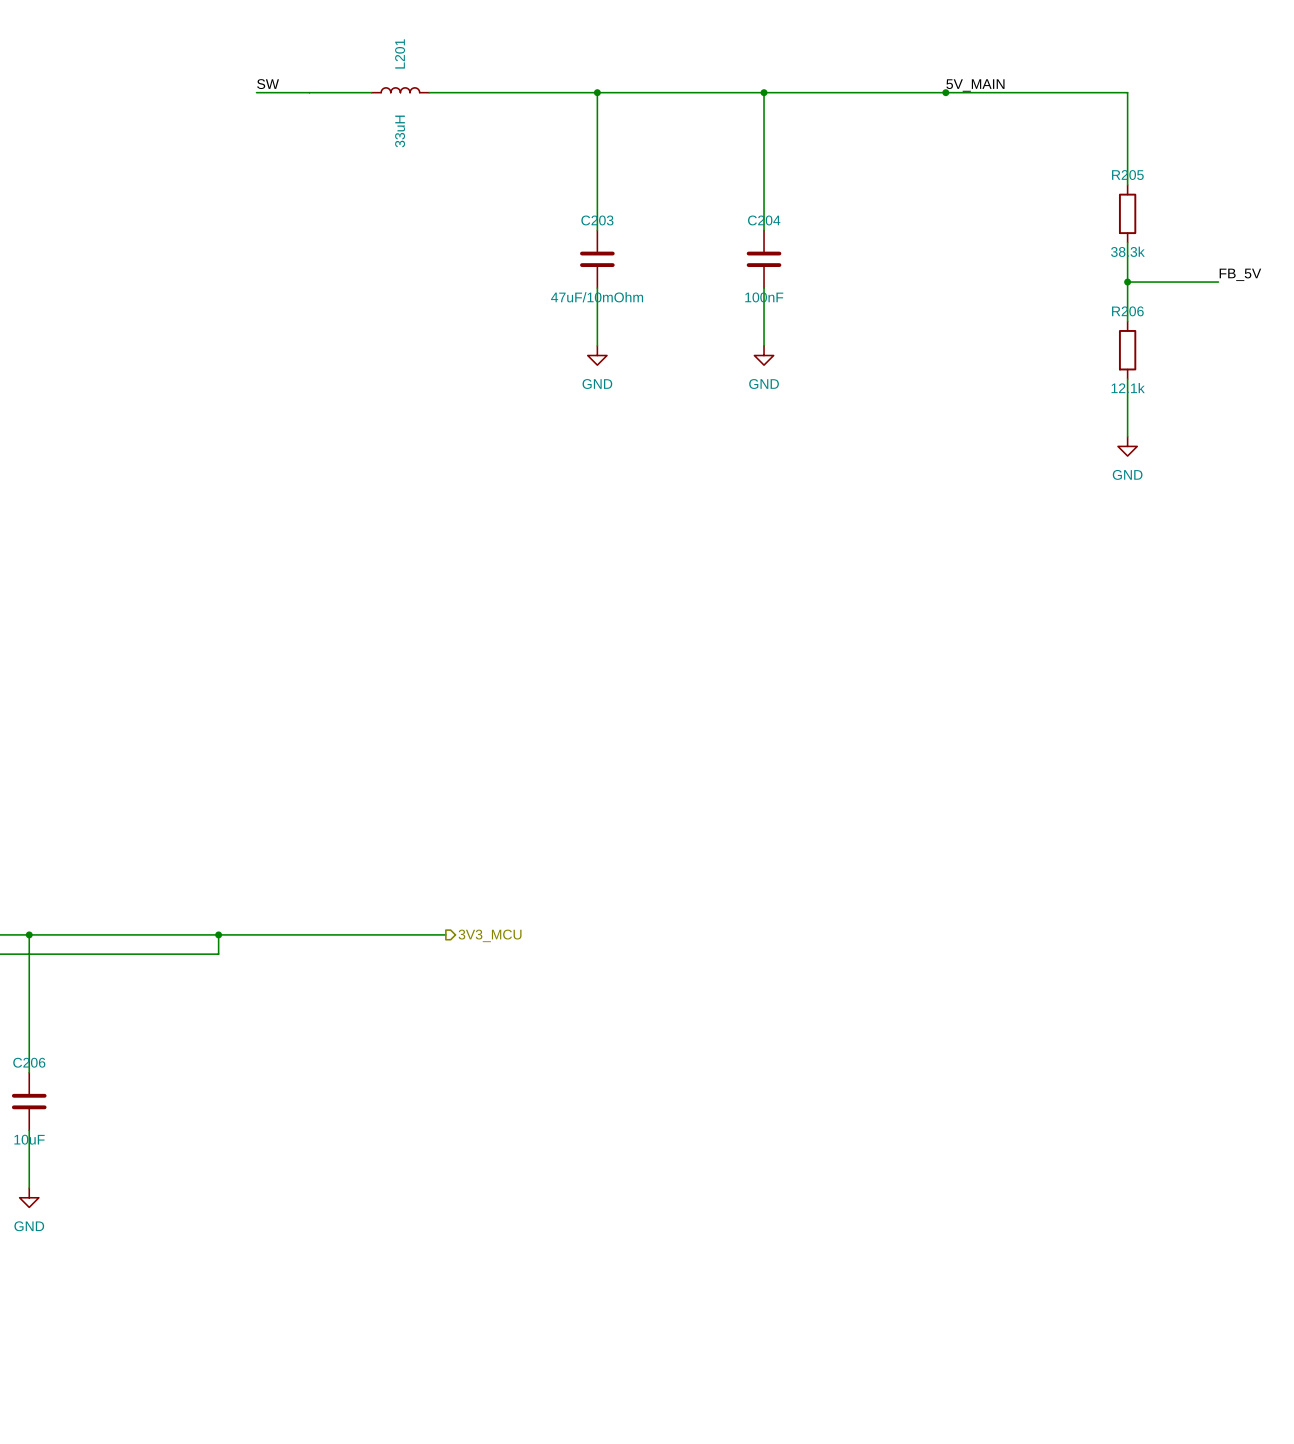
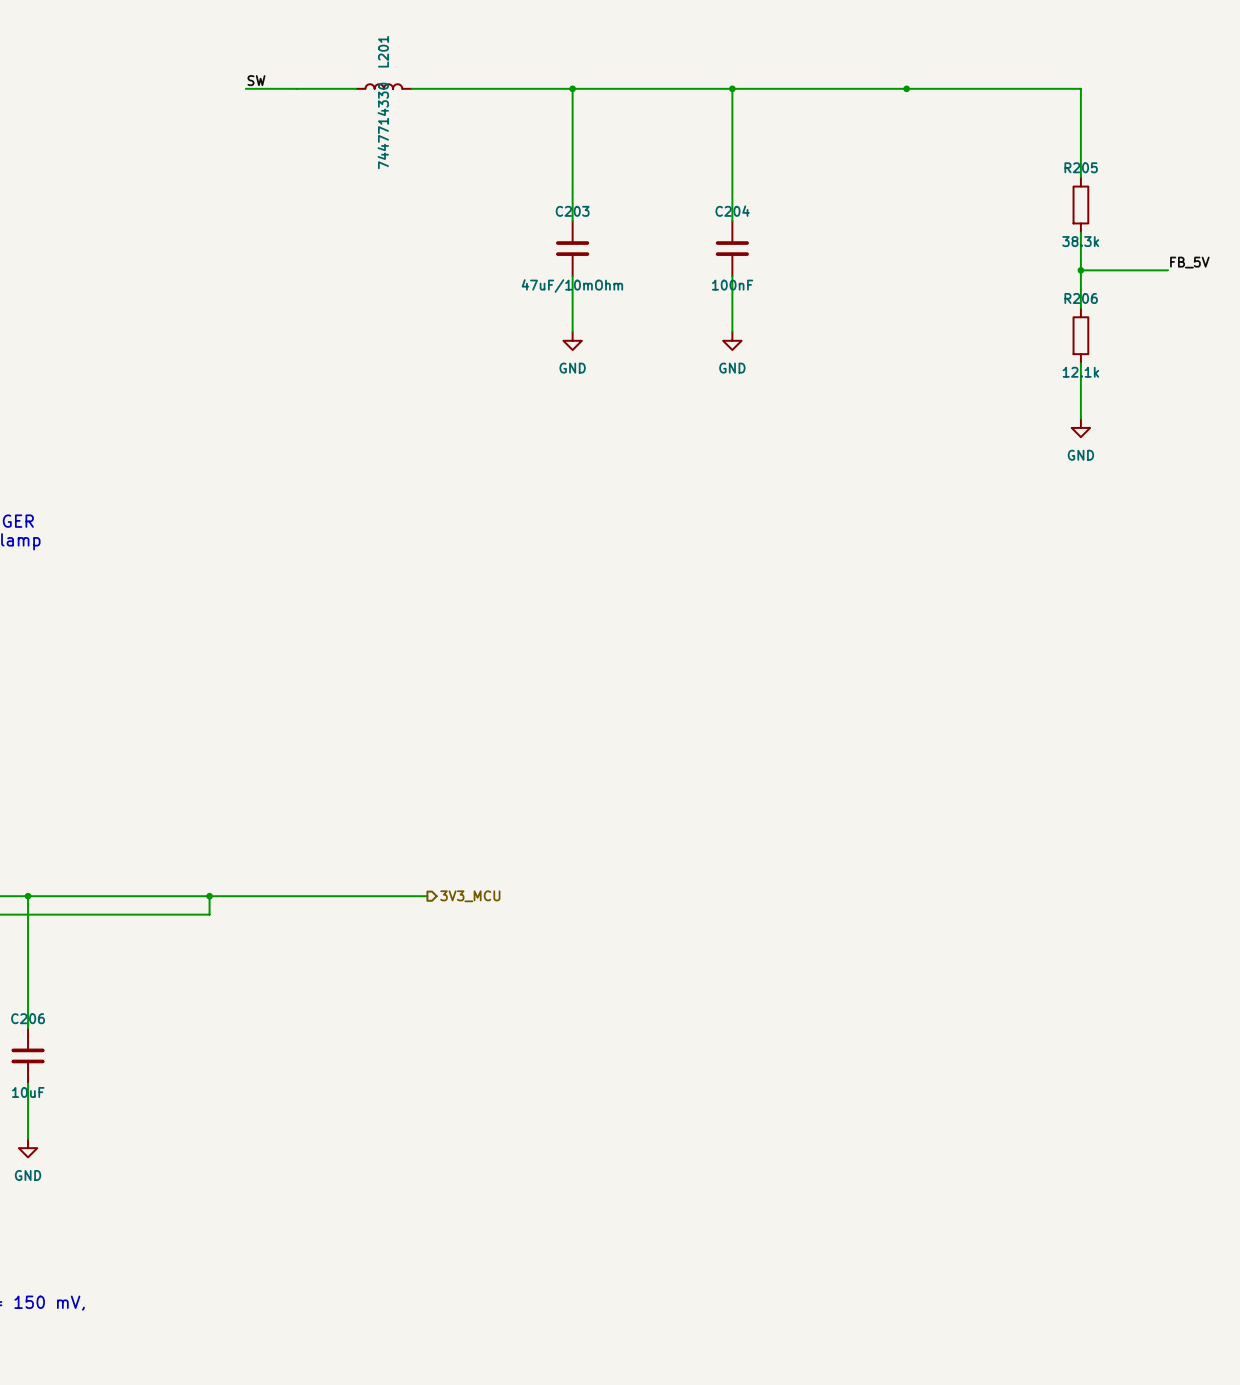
label: 5V_MAIN (975, 85) -> none
L201 value: 33uH (400, 131) -> 7447714330 (383, 125)

